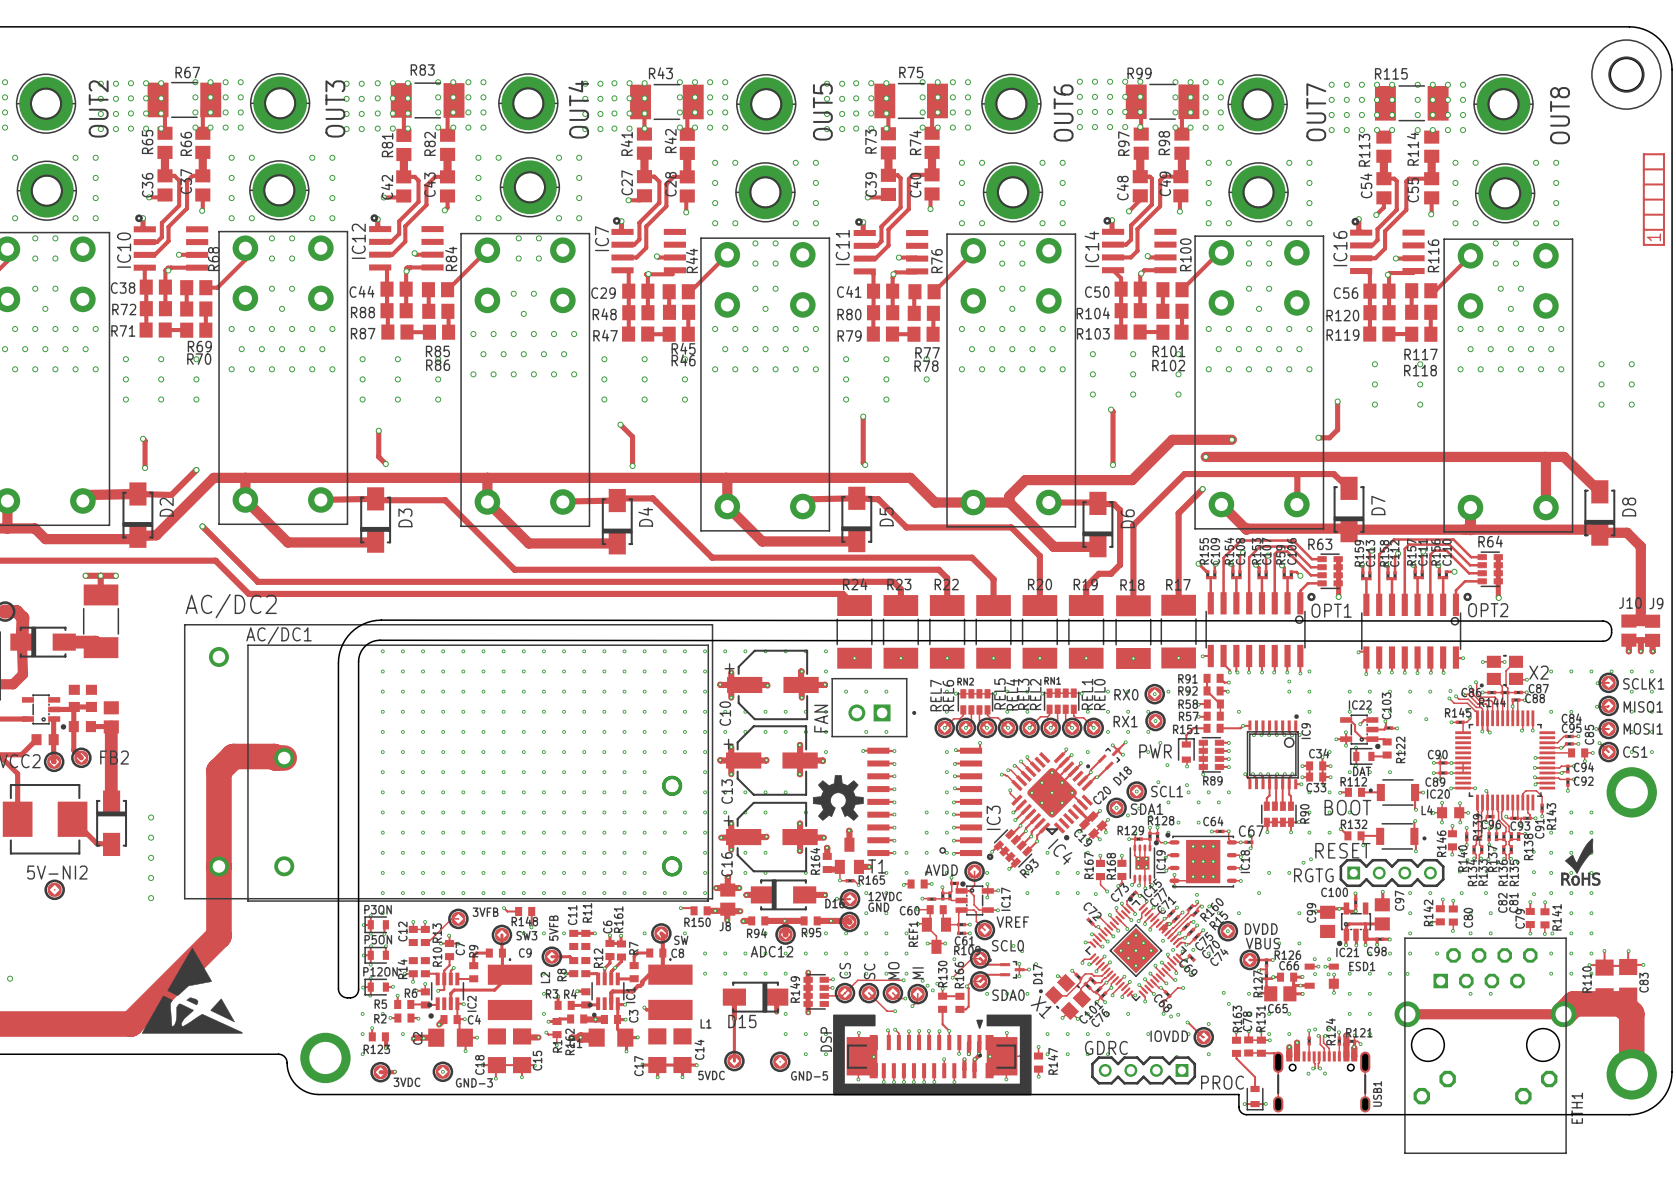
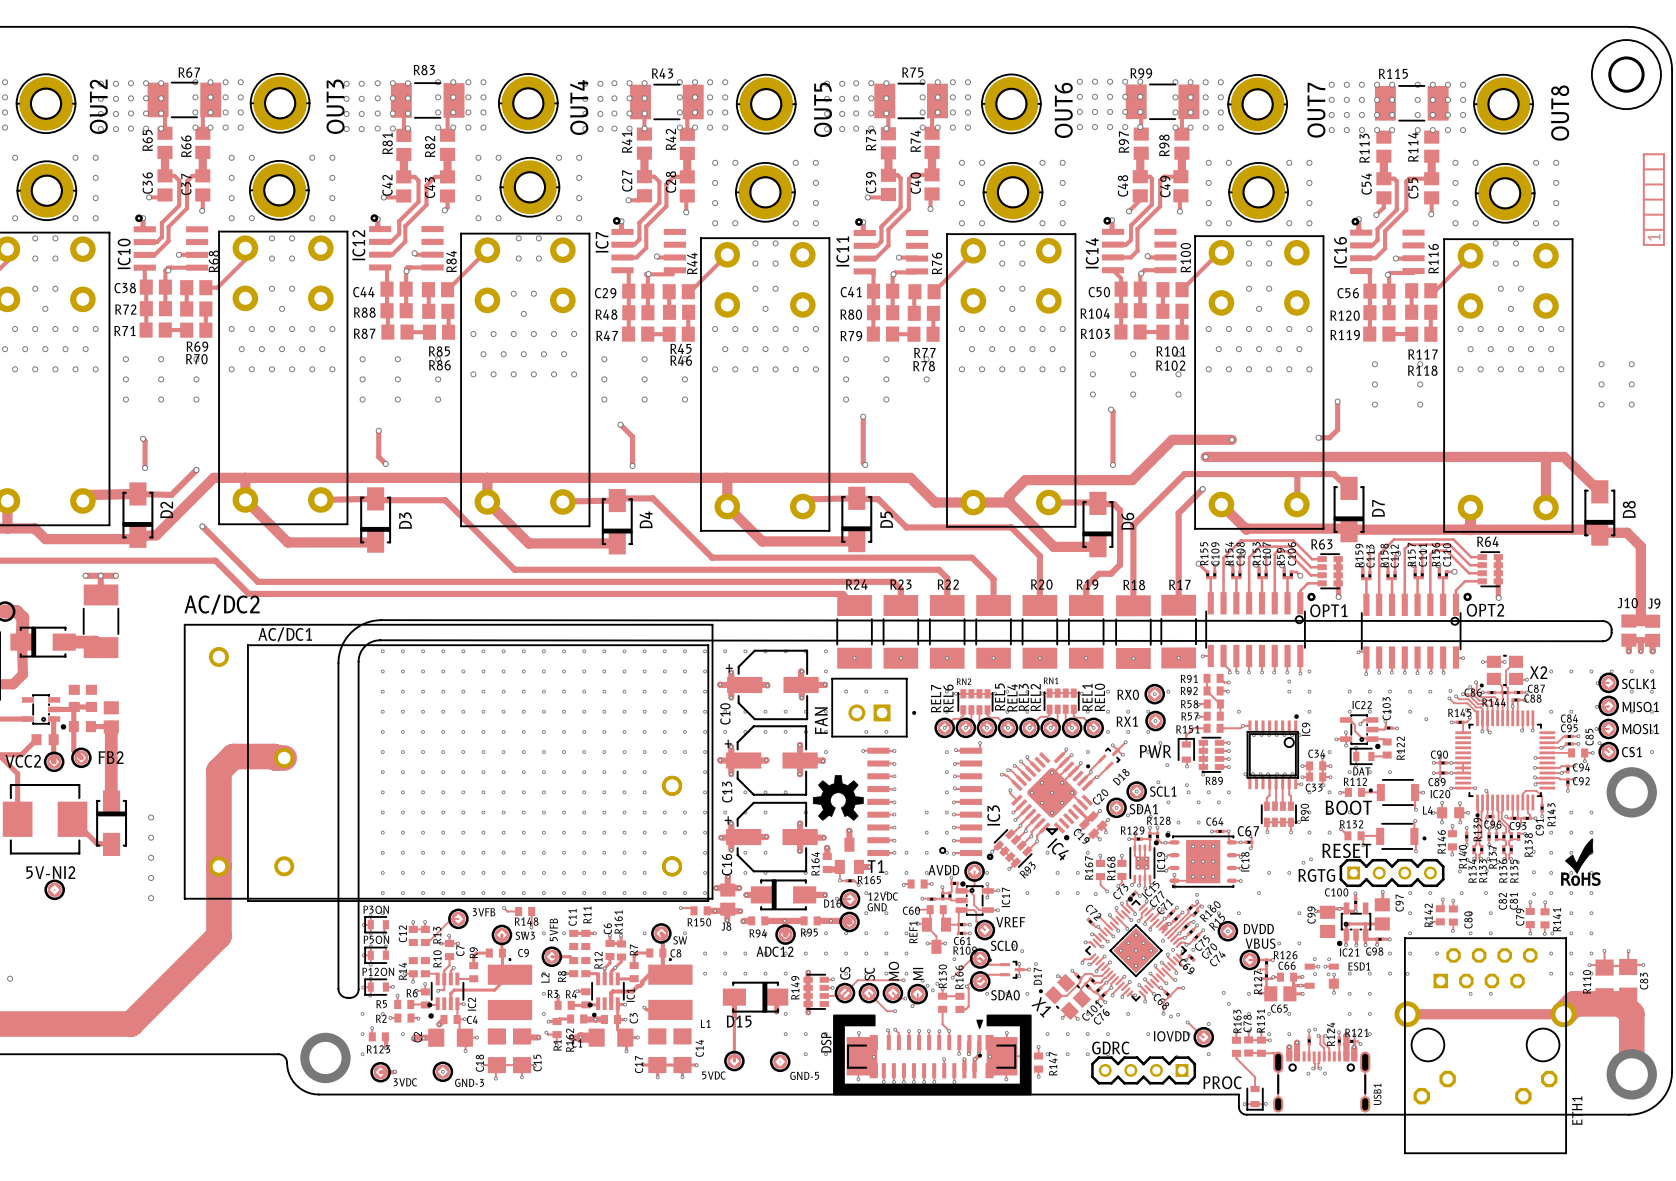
drawing: [141, 947, 243, 1034] -> none

